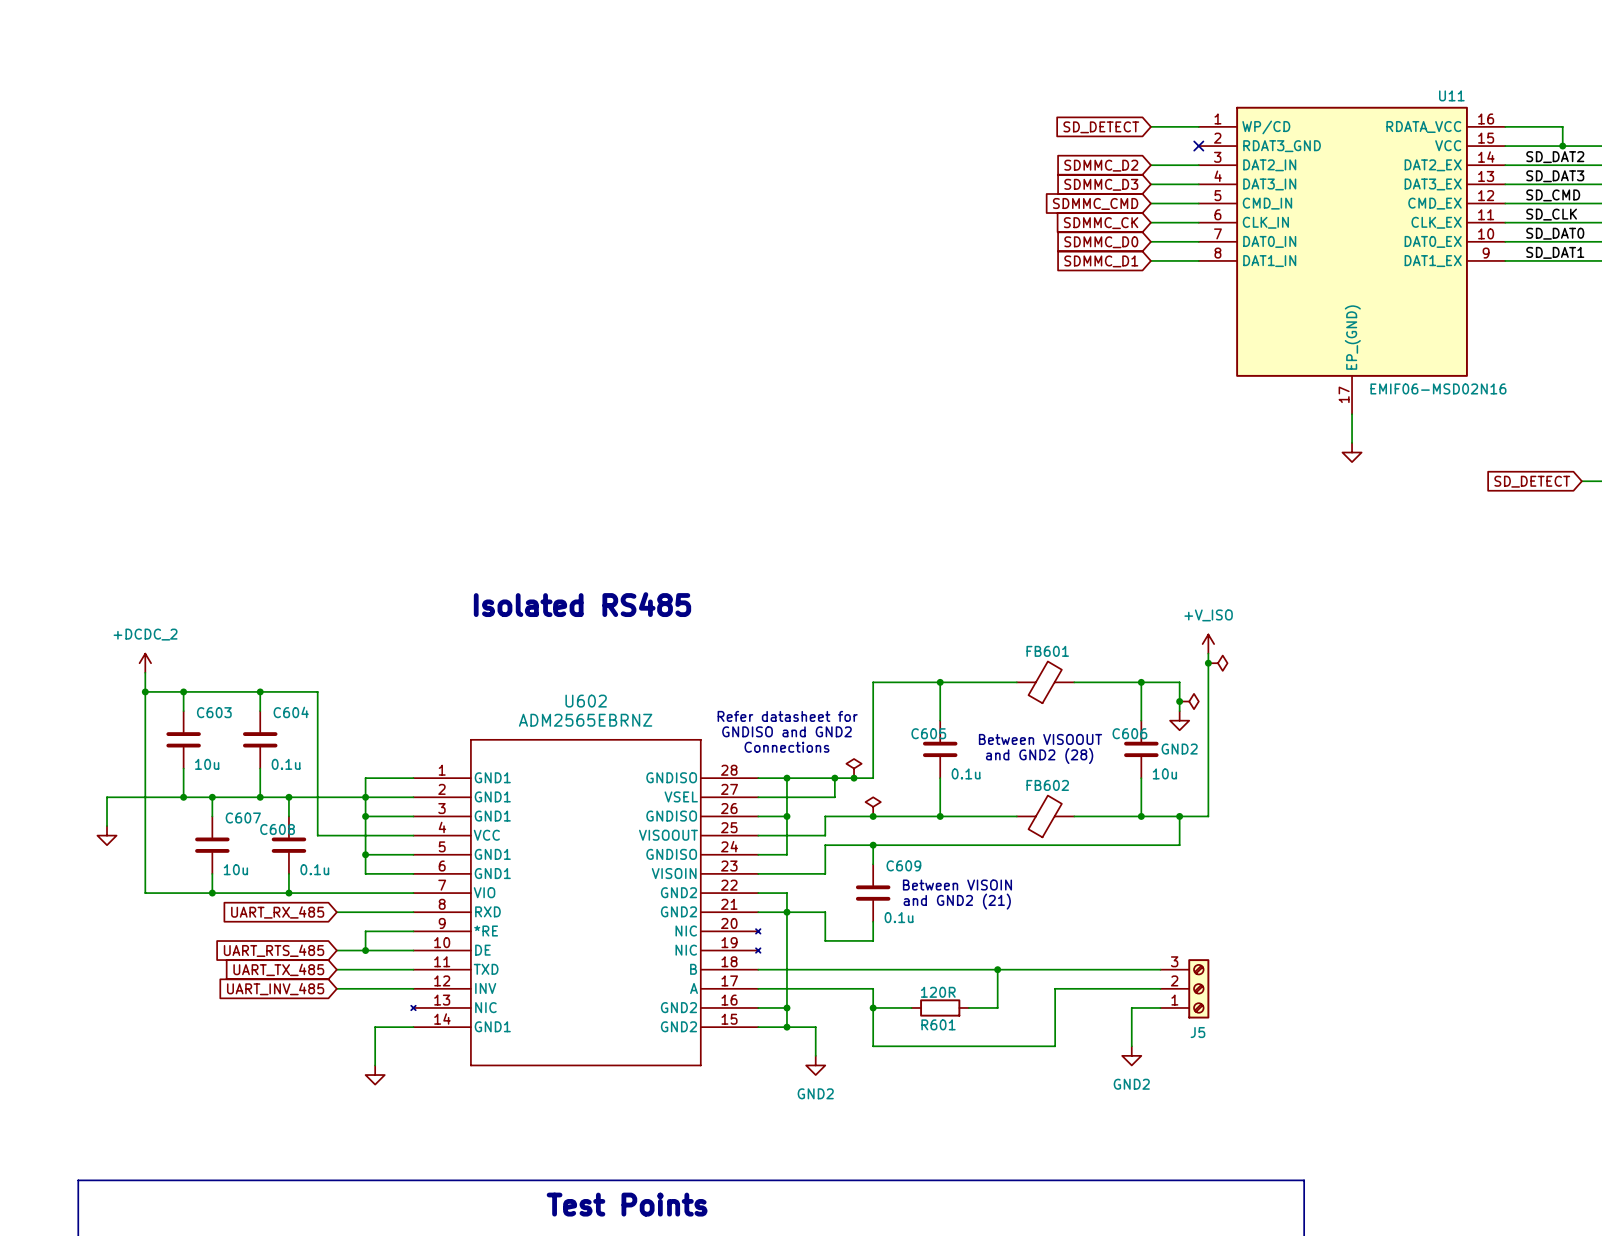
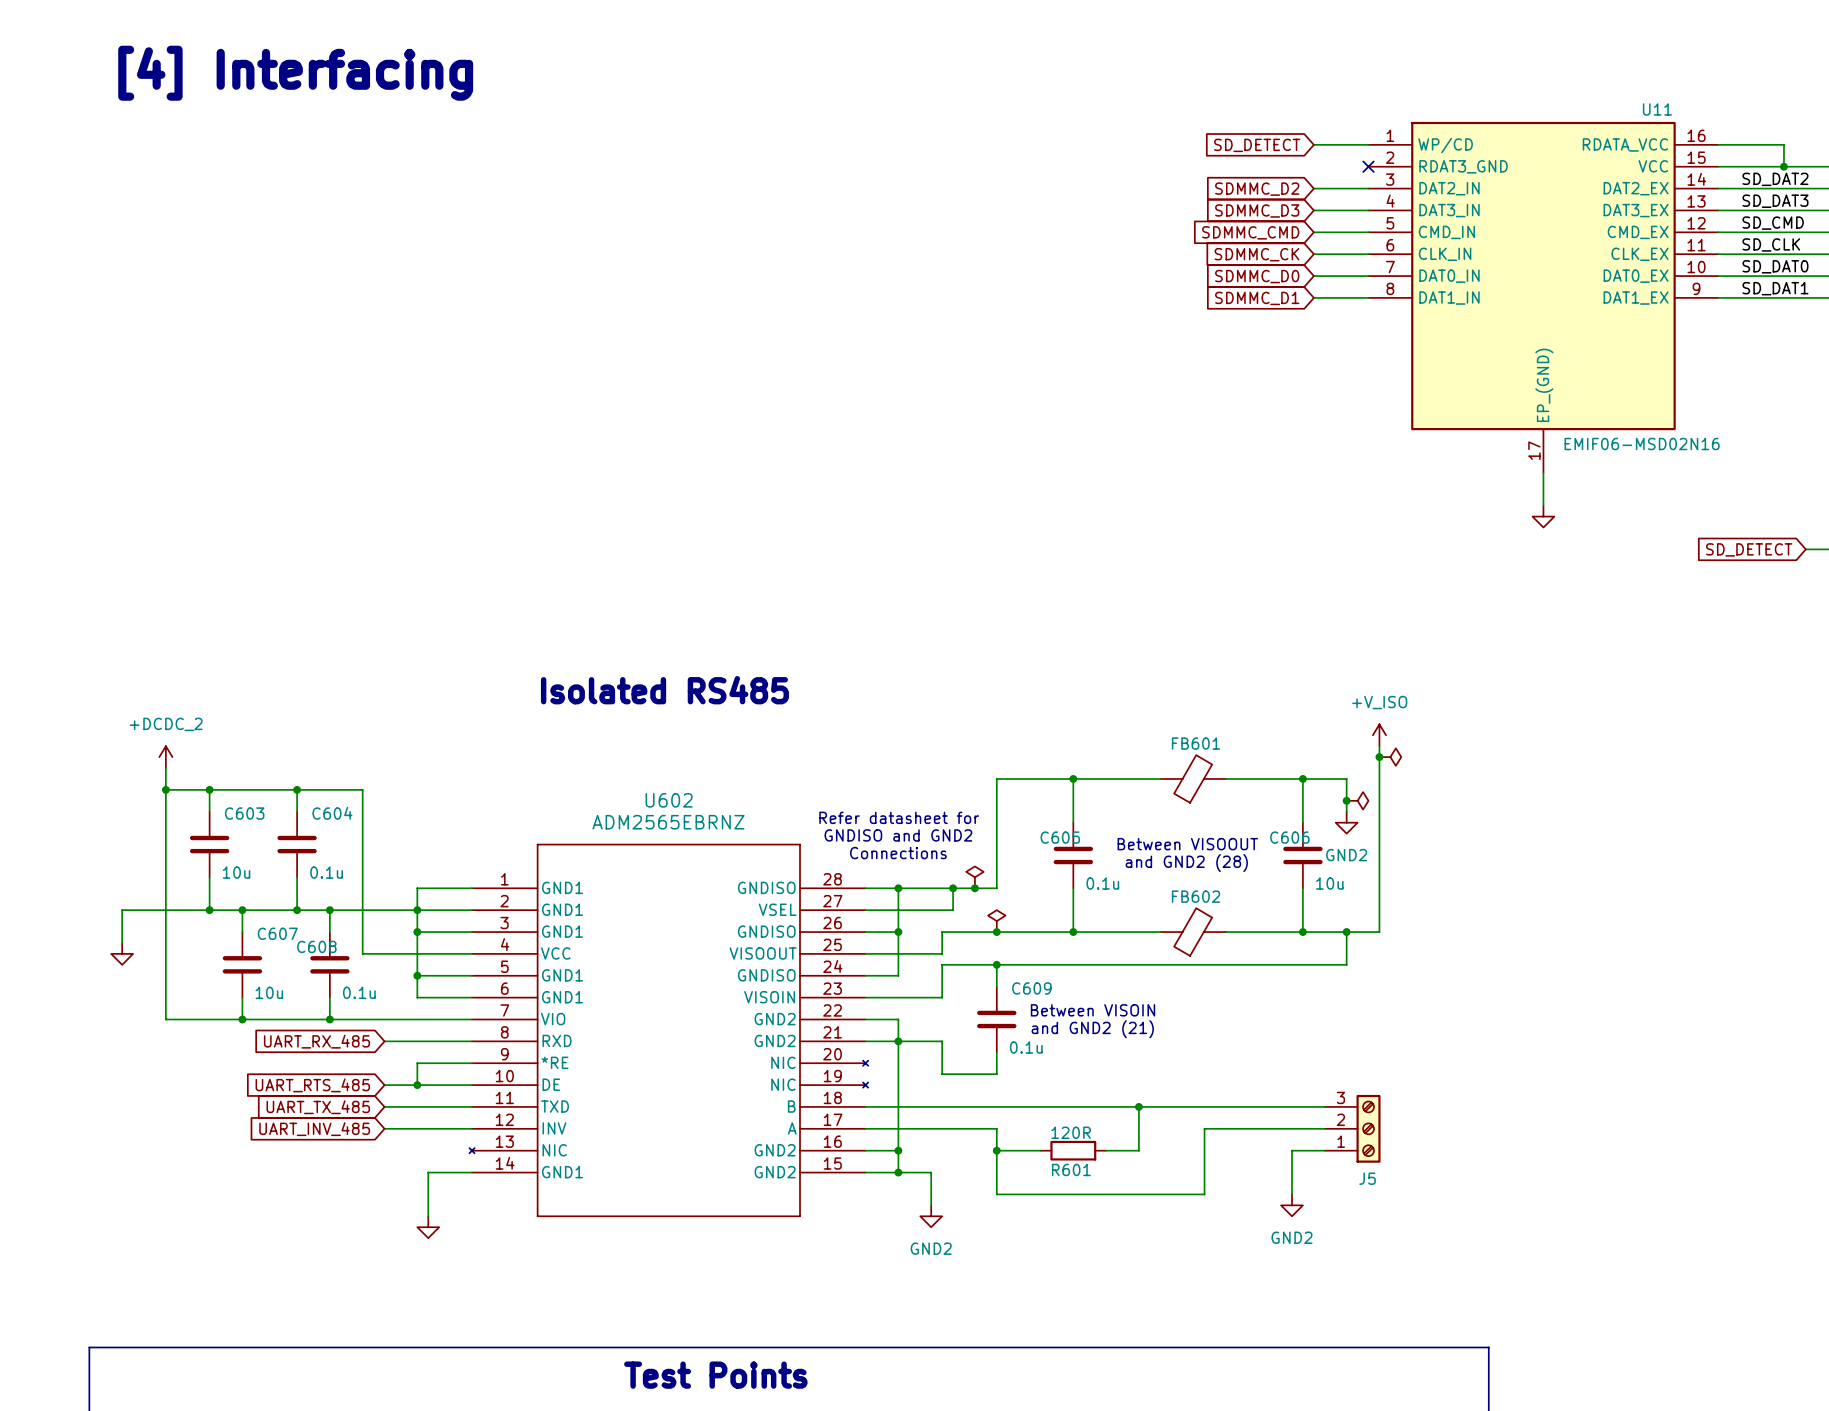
text: none -> [4] Interfacing (295, 73)

